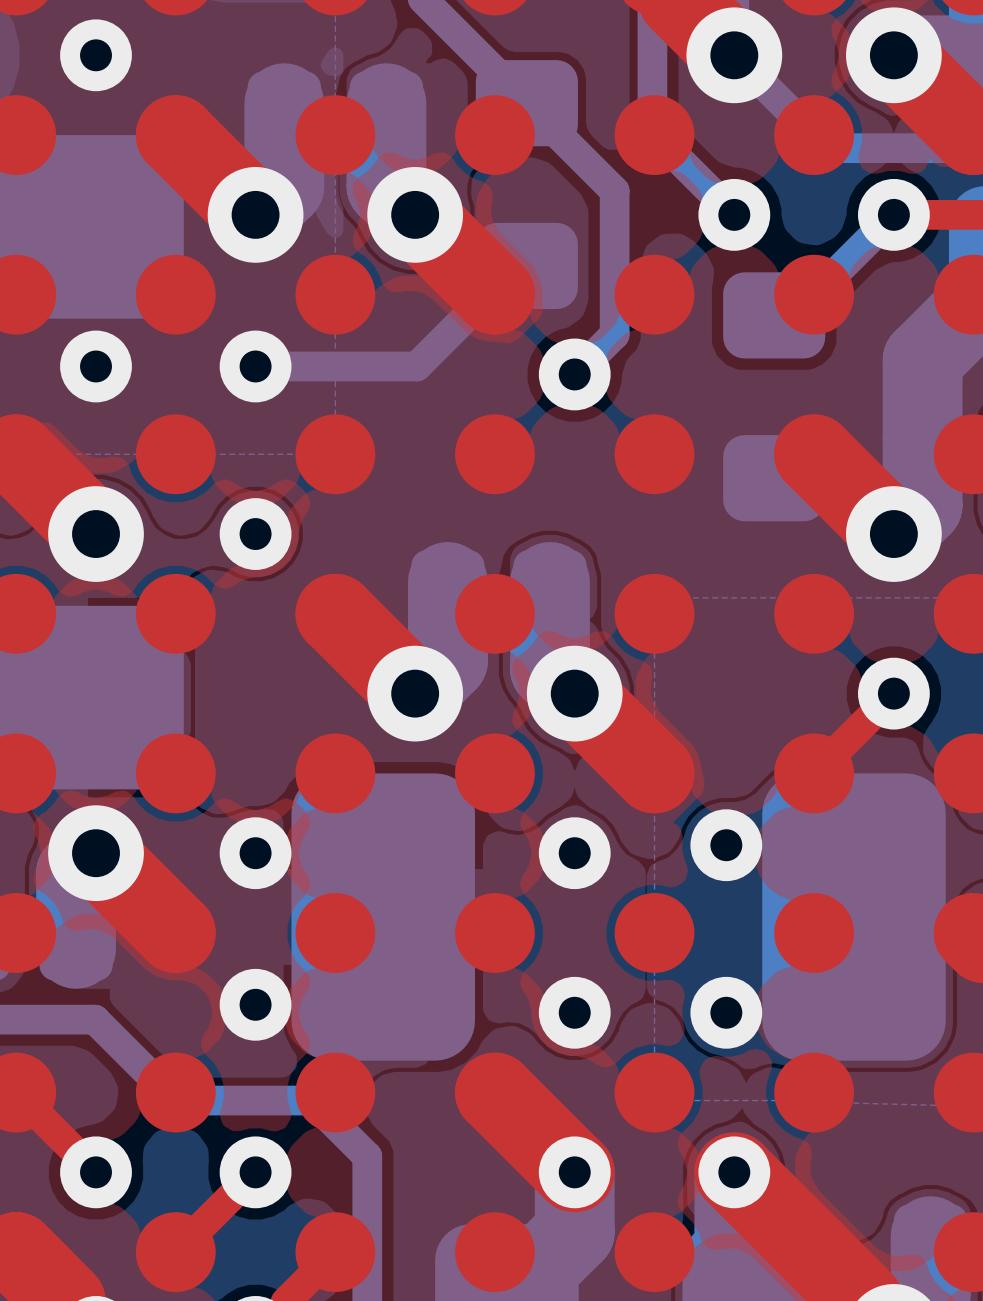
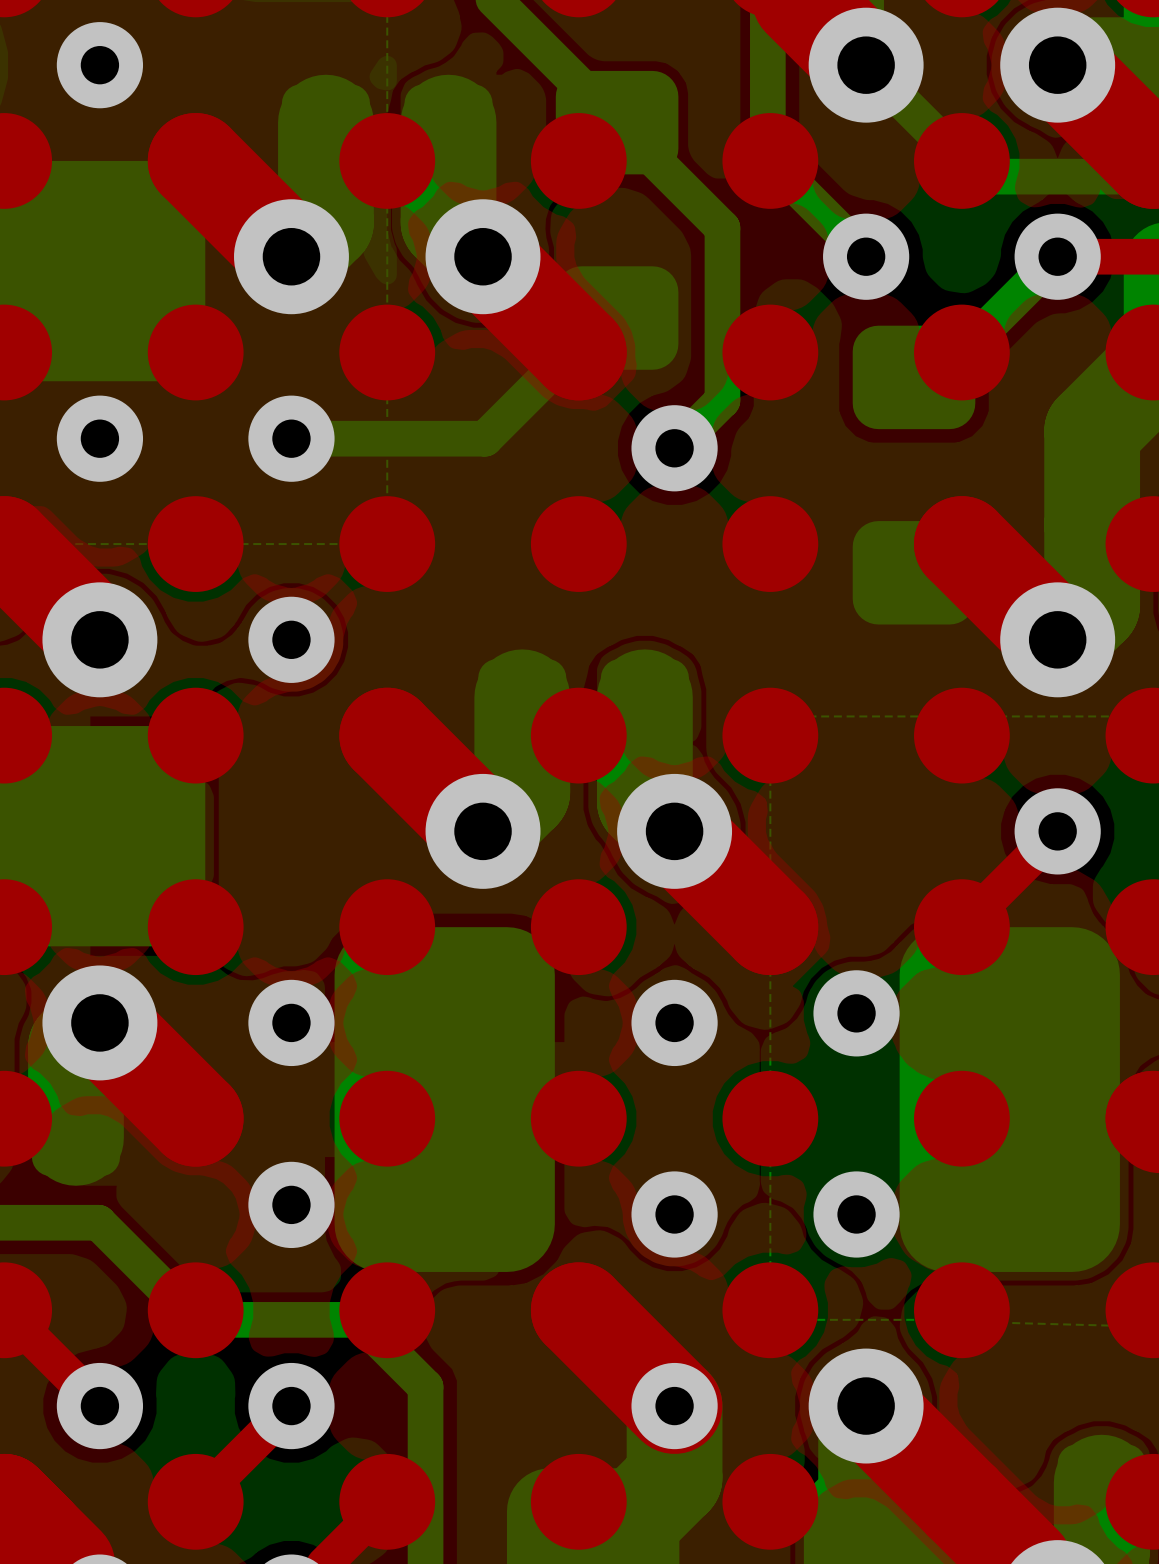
via size: [698, 1136, 771, 1209] -> [808, 1348, 924, 1464]

